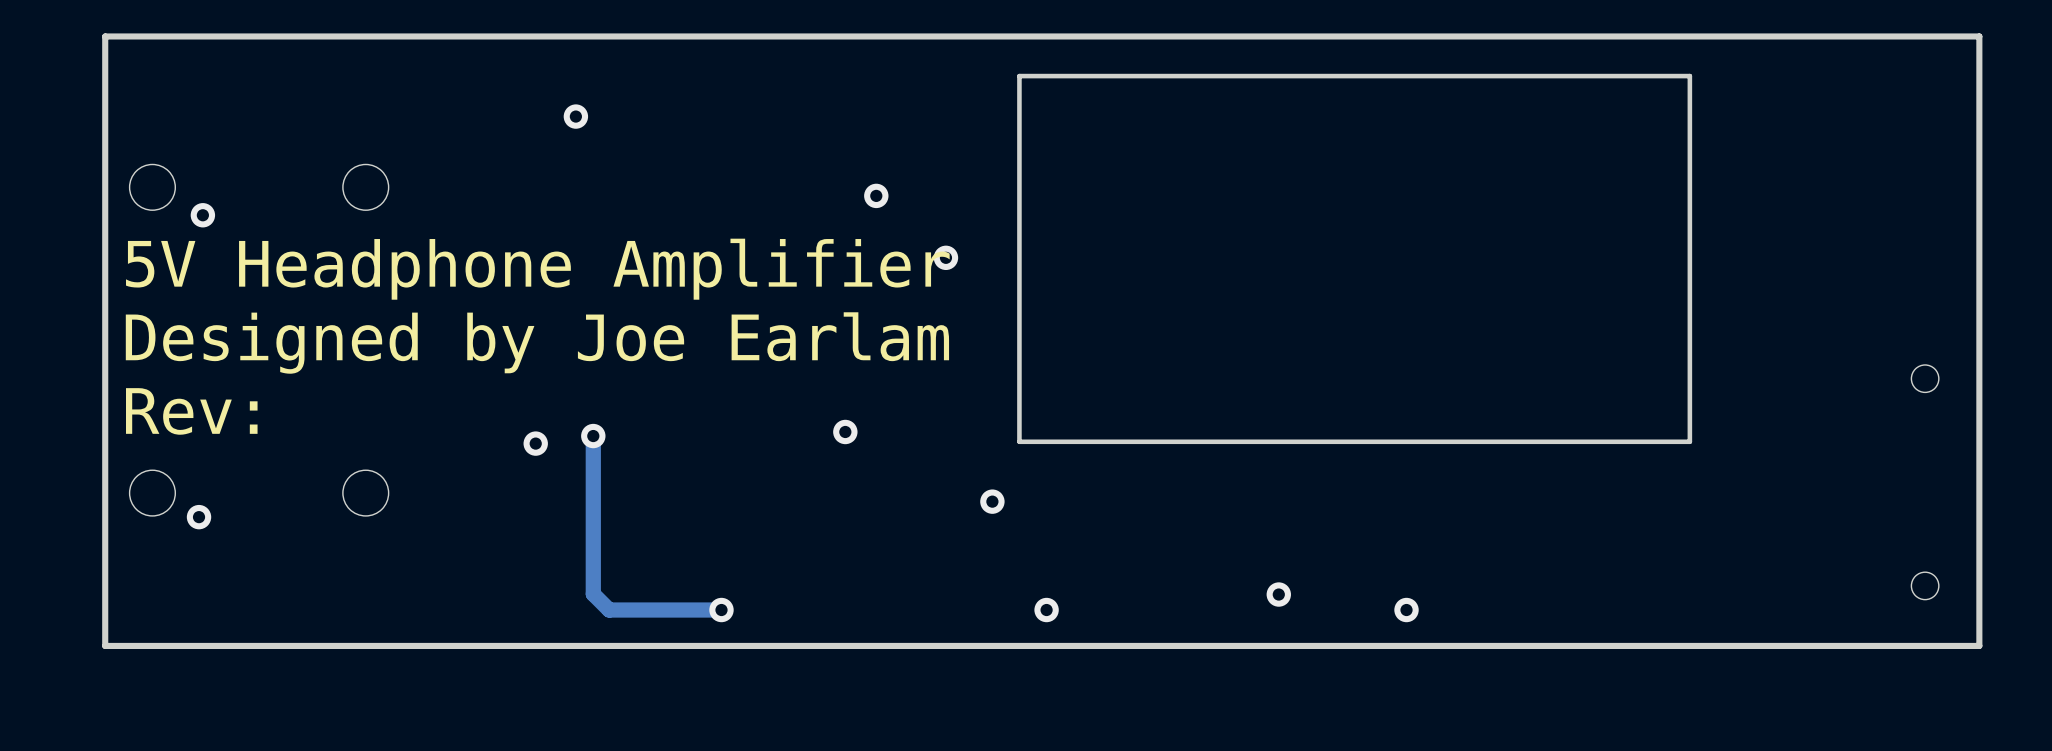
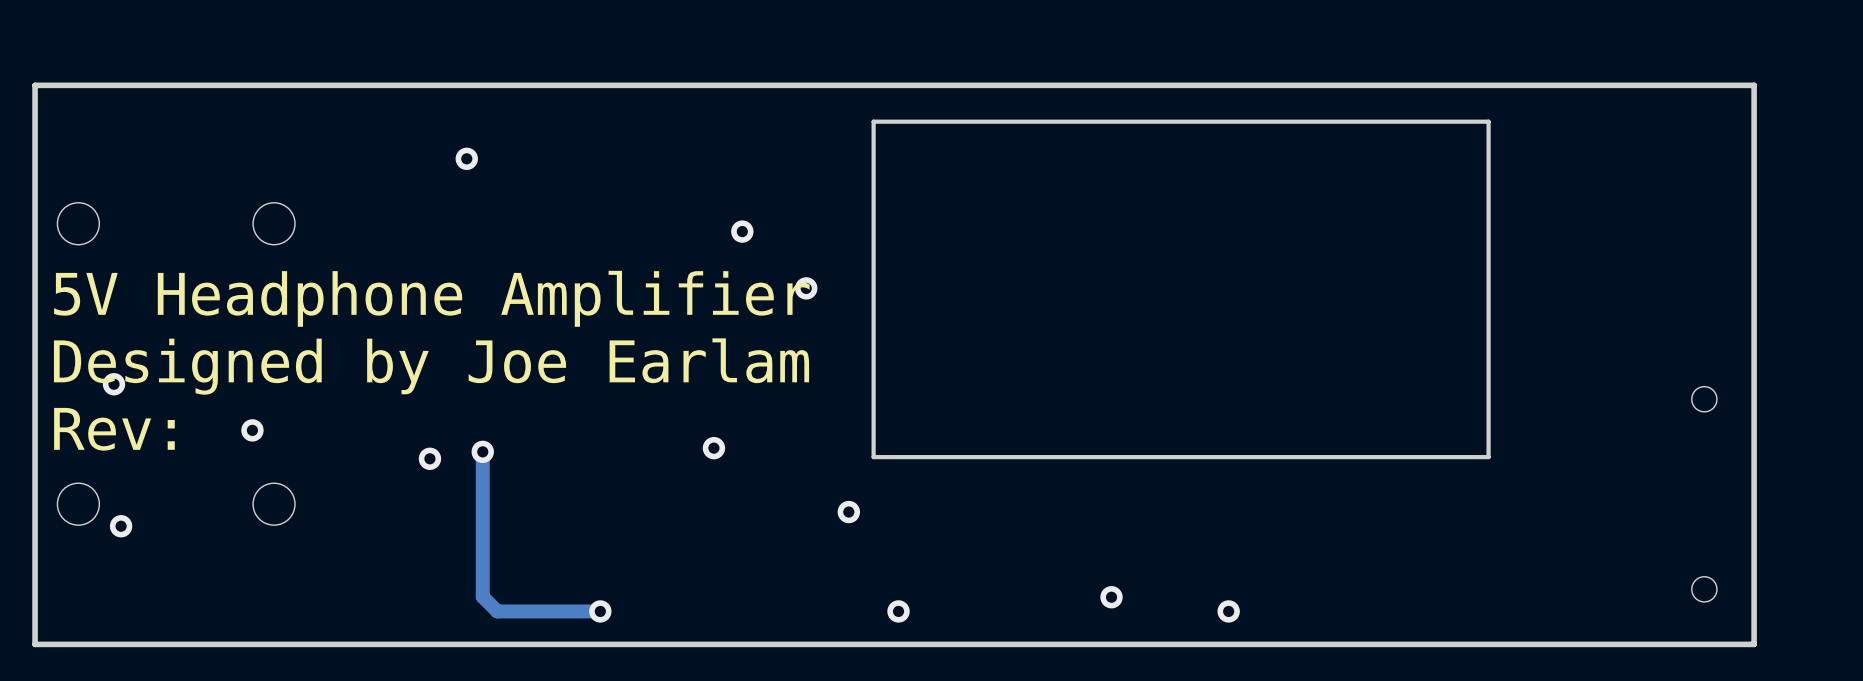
via: (202, 215) -> none
via: none -> (113, 384)
via: none -> (252, 430)

